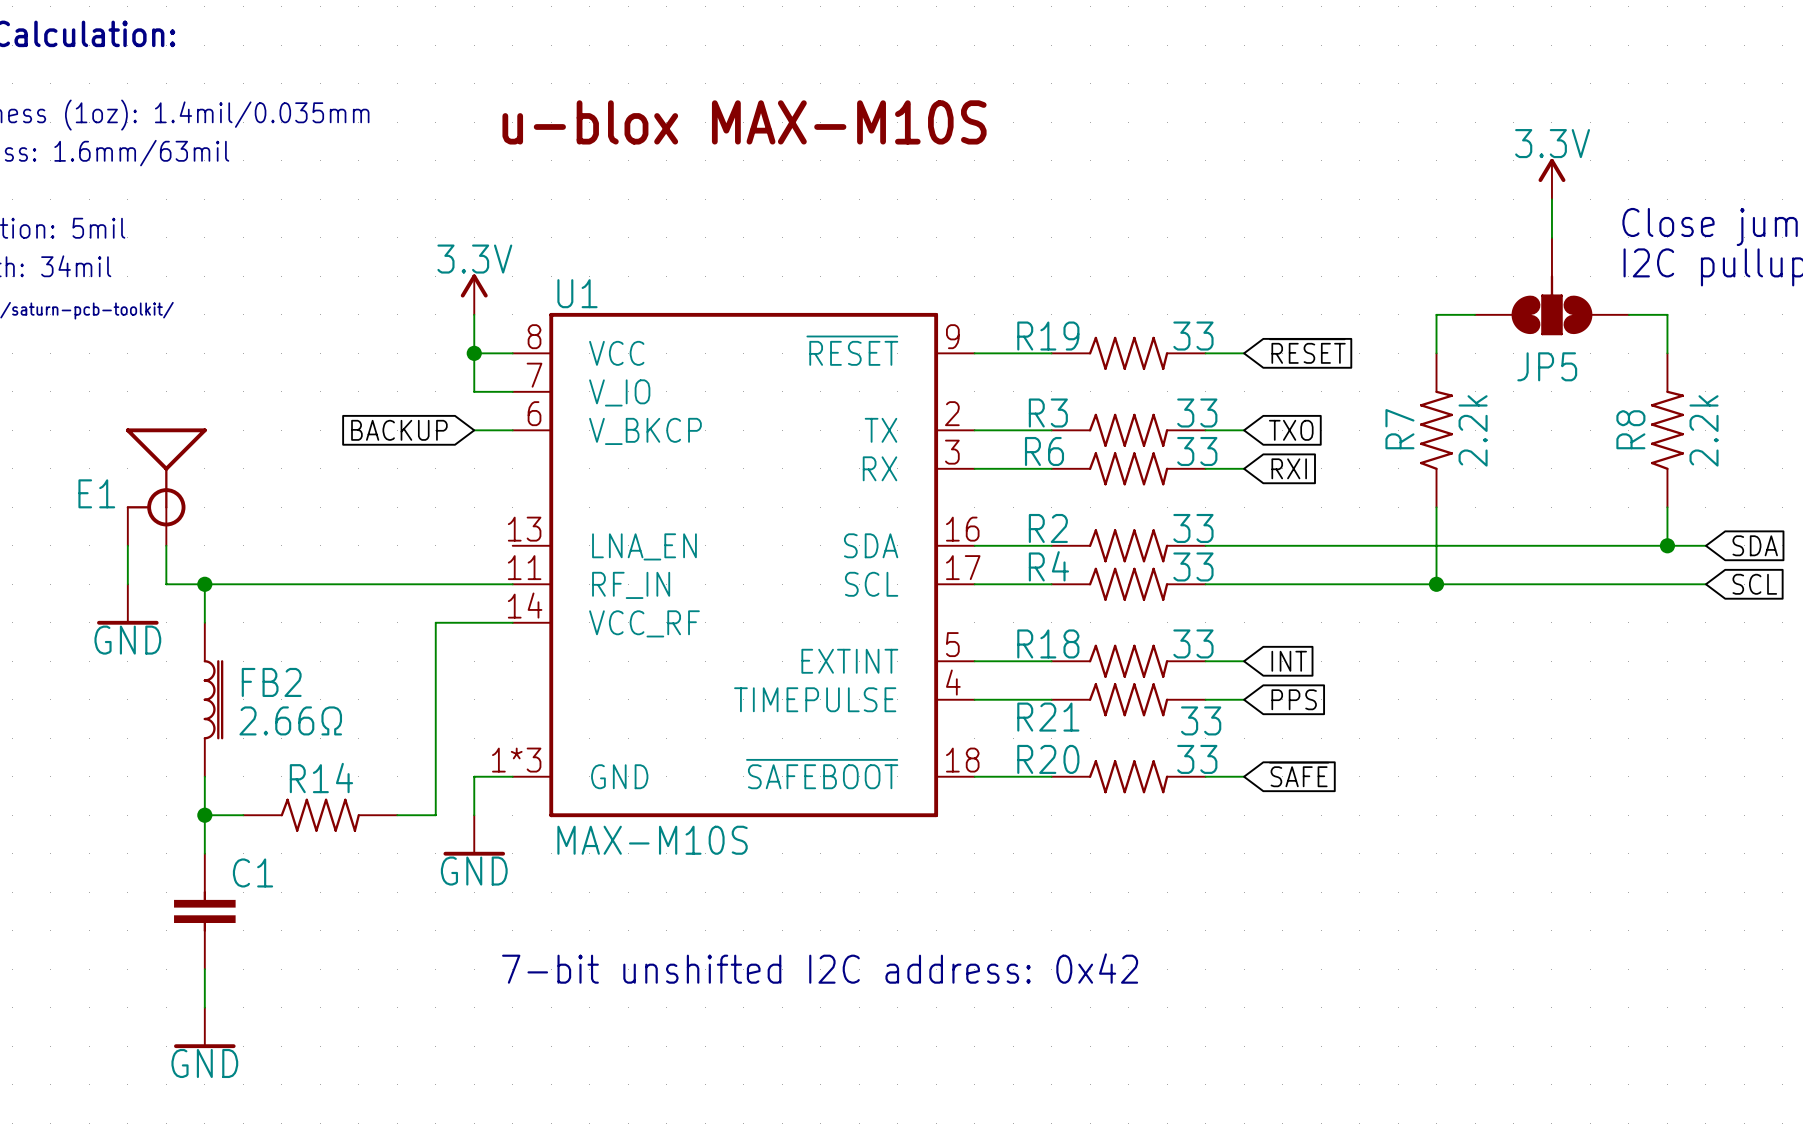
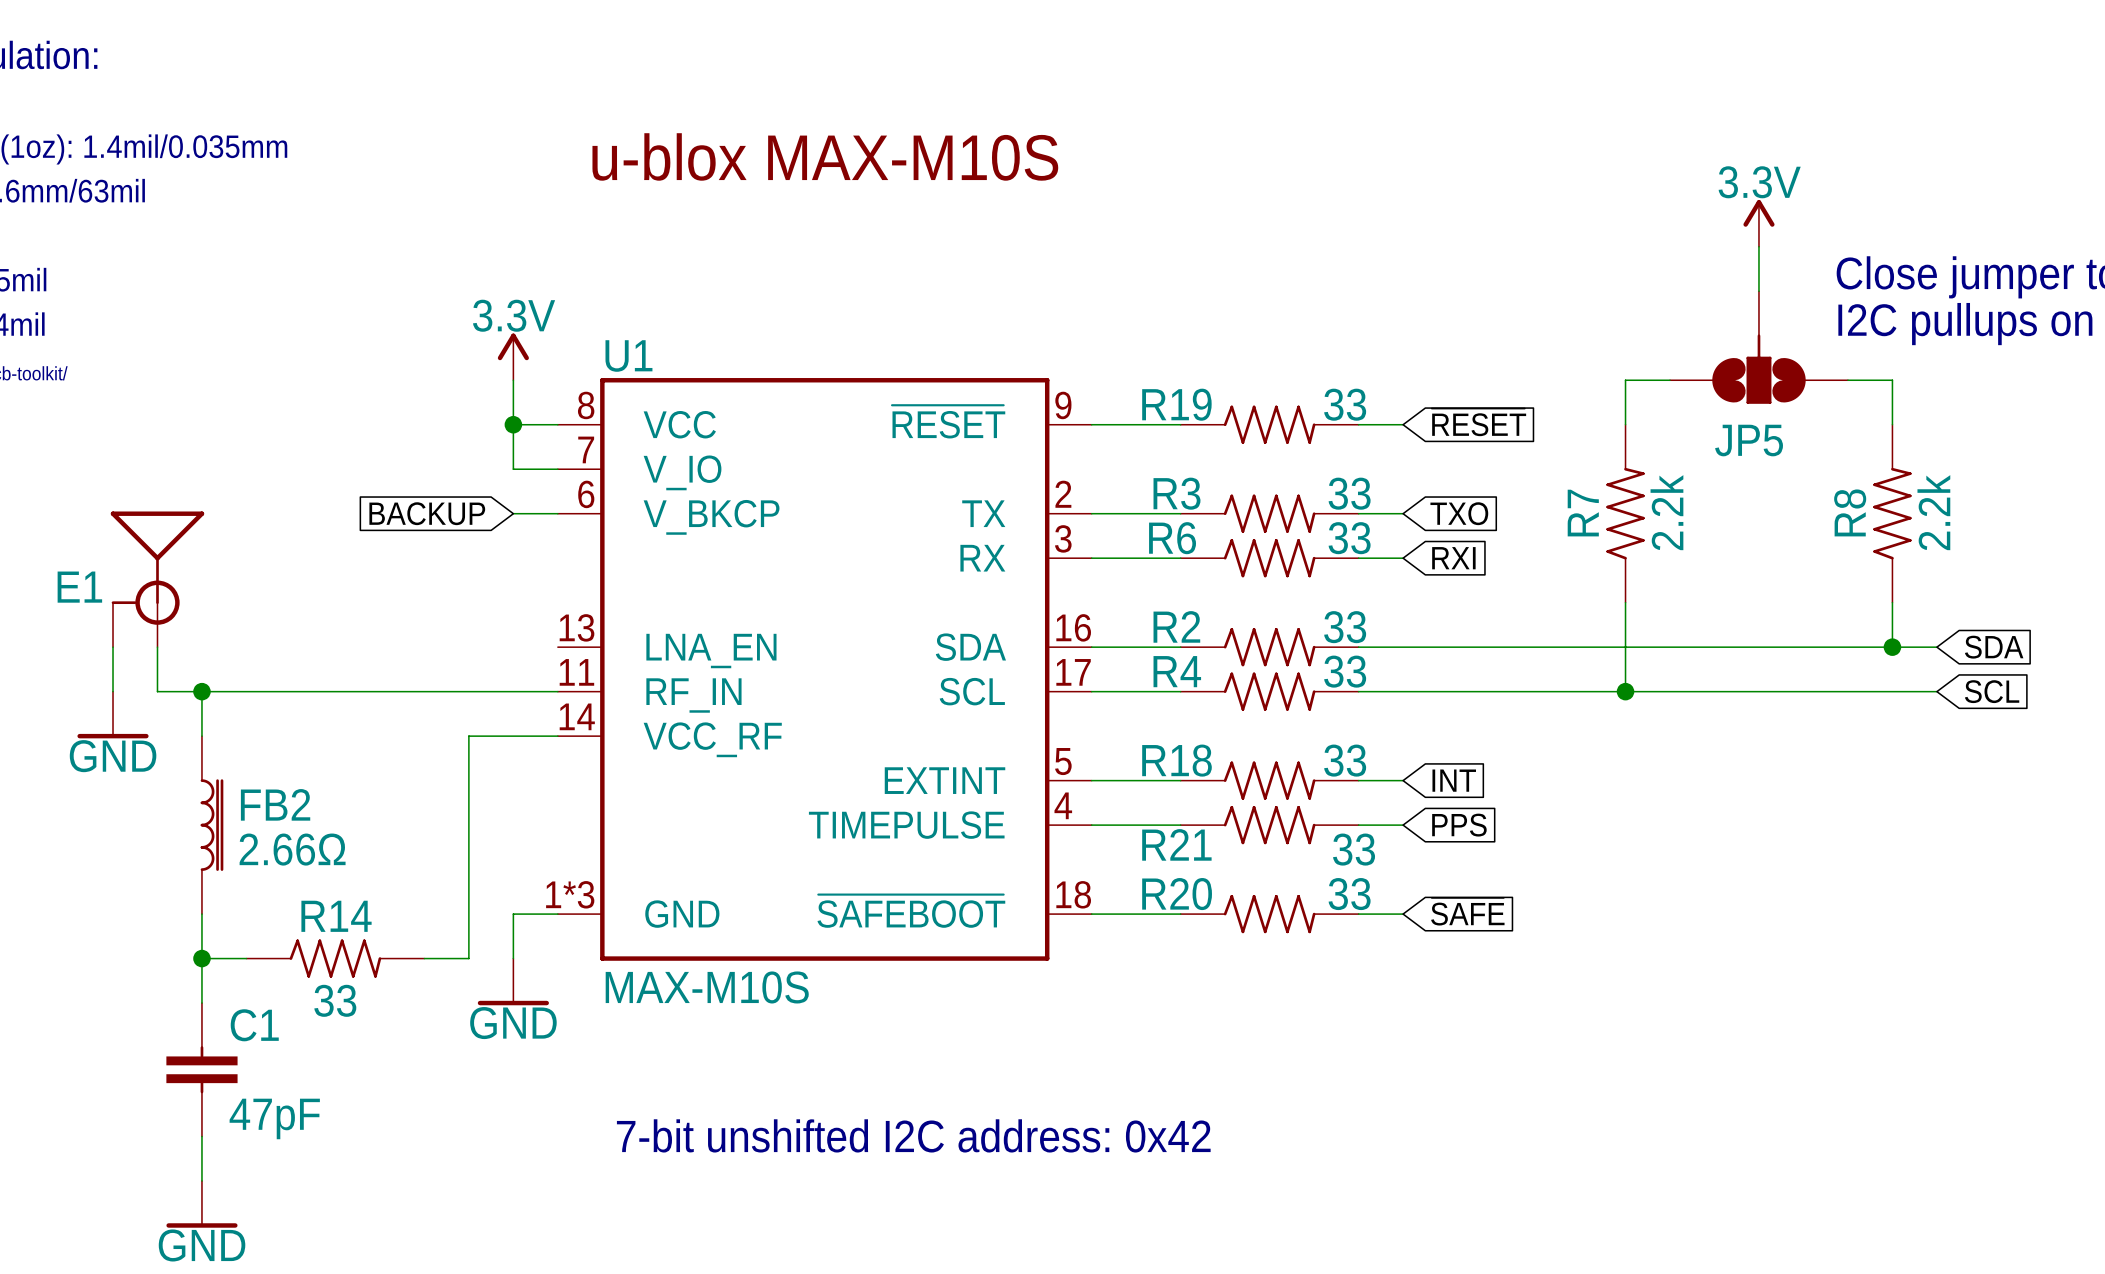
R14 value: none -> 33 (335, 1000)
C1 value: none -> 47pF (274, 1118)

